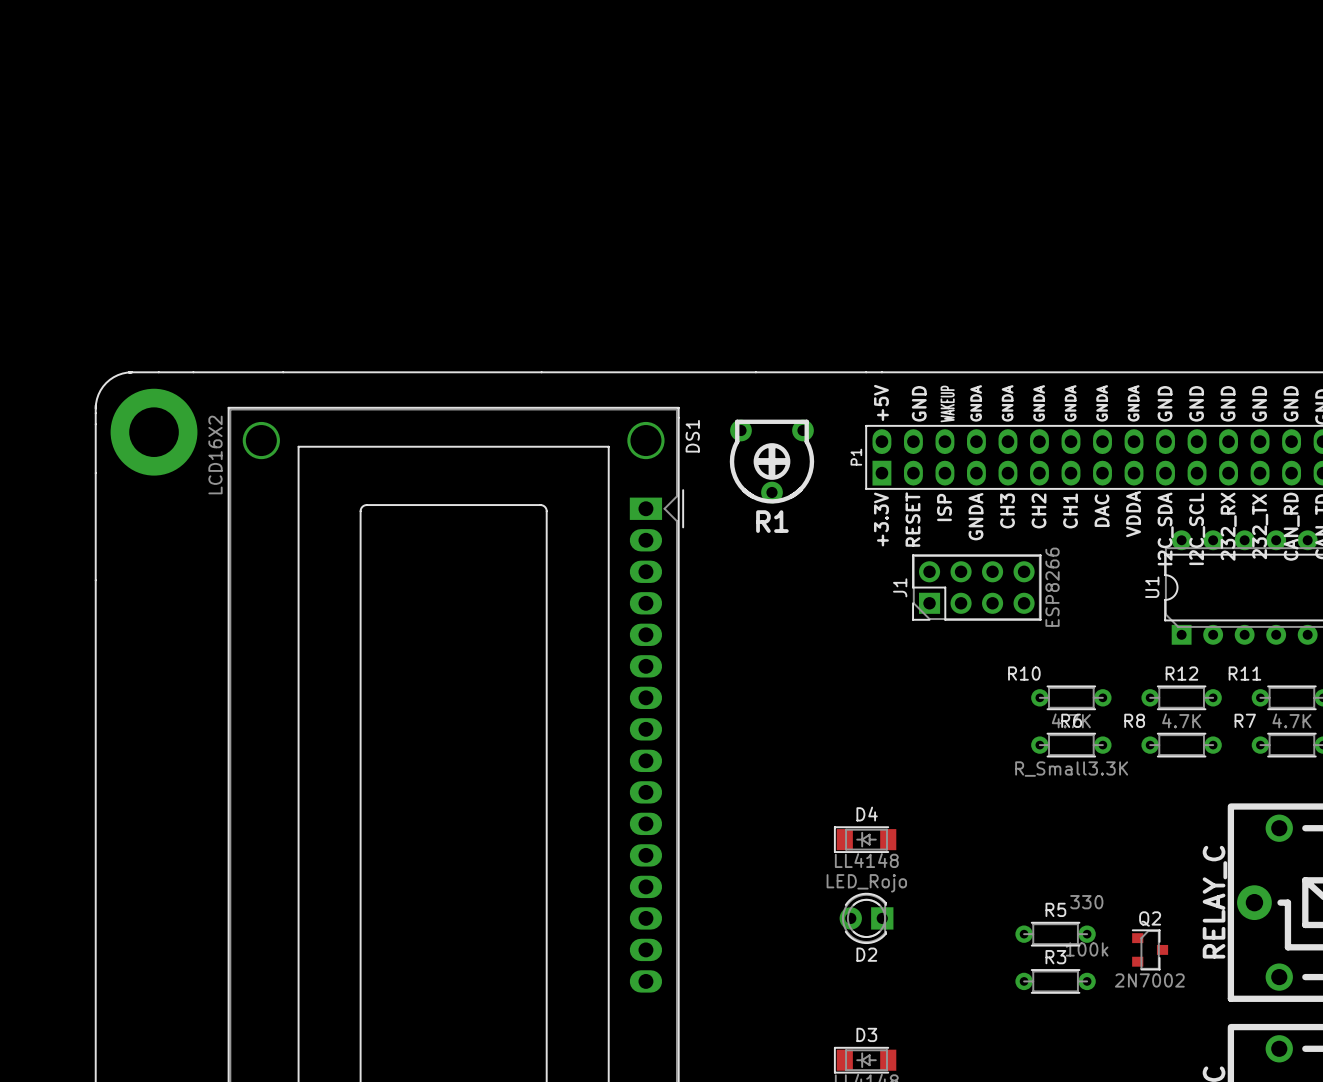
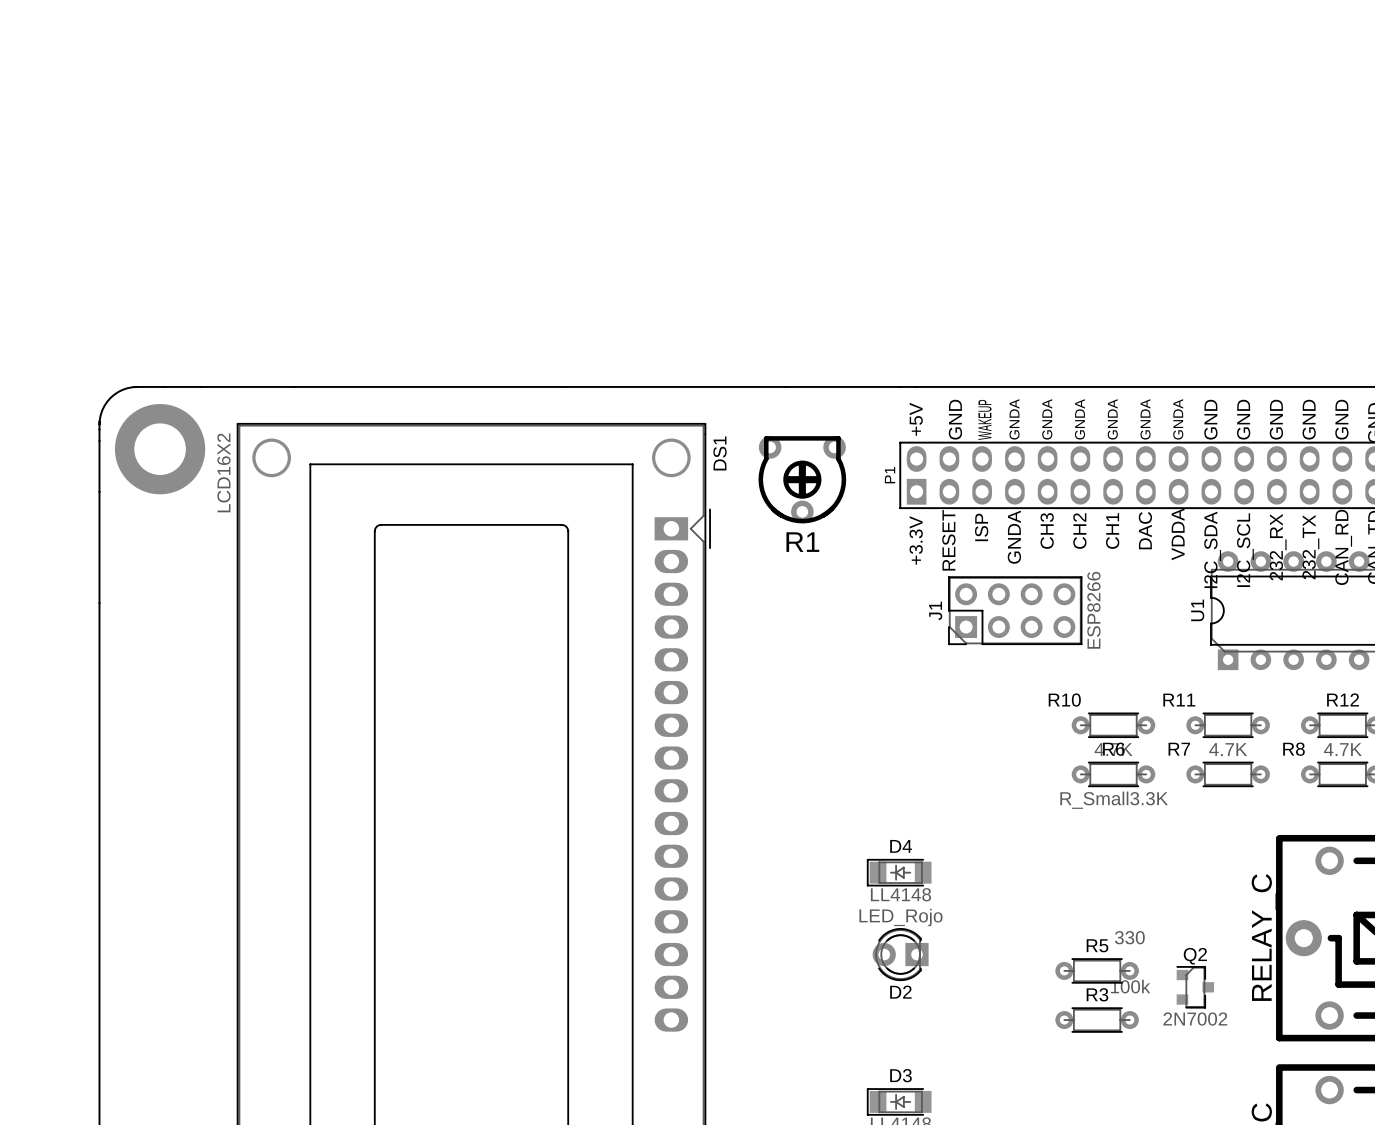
R12 name: R12 (1181, 673) -> R11 (1179, 700)
R11 name: R11 (1244, 673) -> R12 (1343, 699)
R8 name: R8 (1134, 720) -> R7 (1179, 749)
R7 name: R7 (1245, 720) -> R8 (1293, 749)

